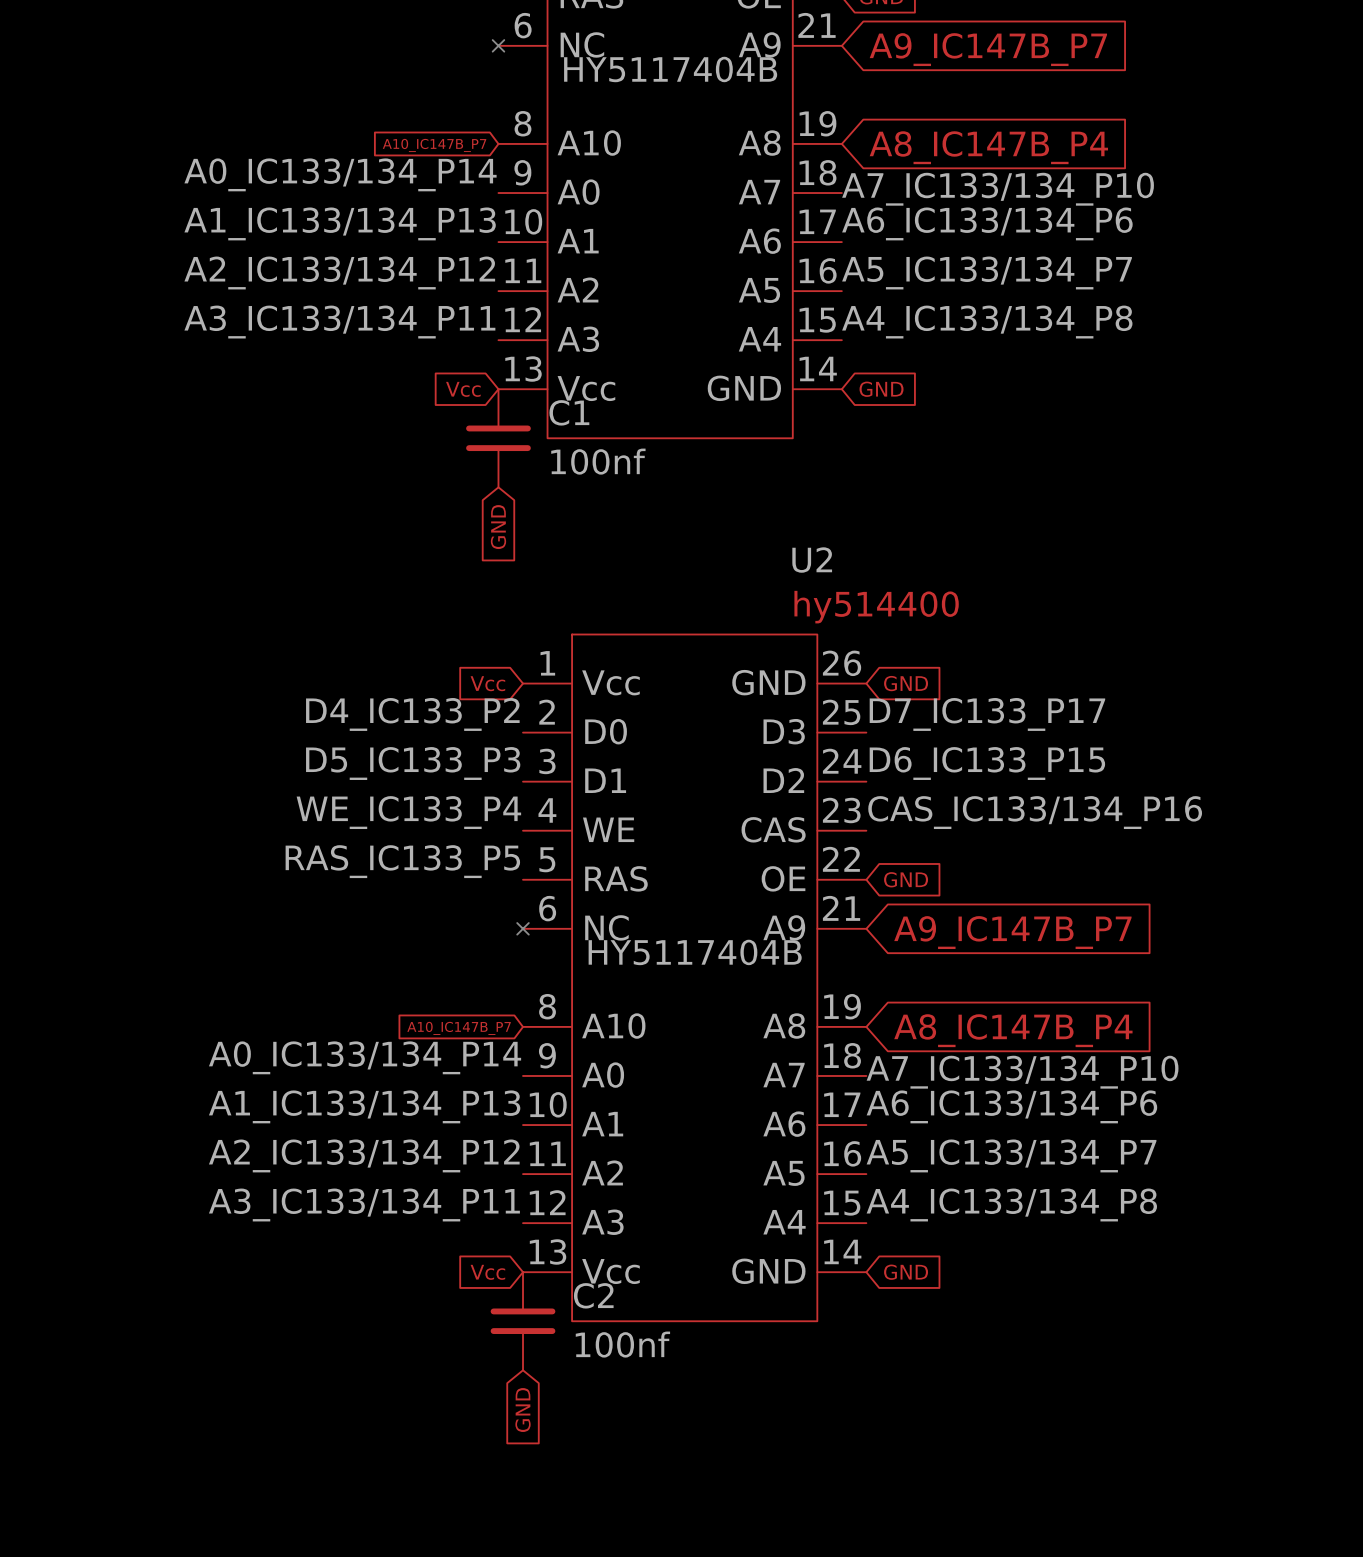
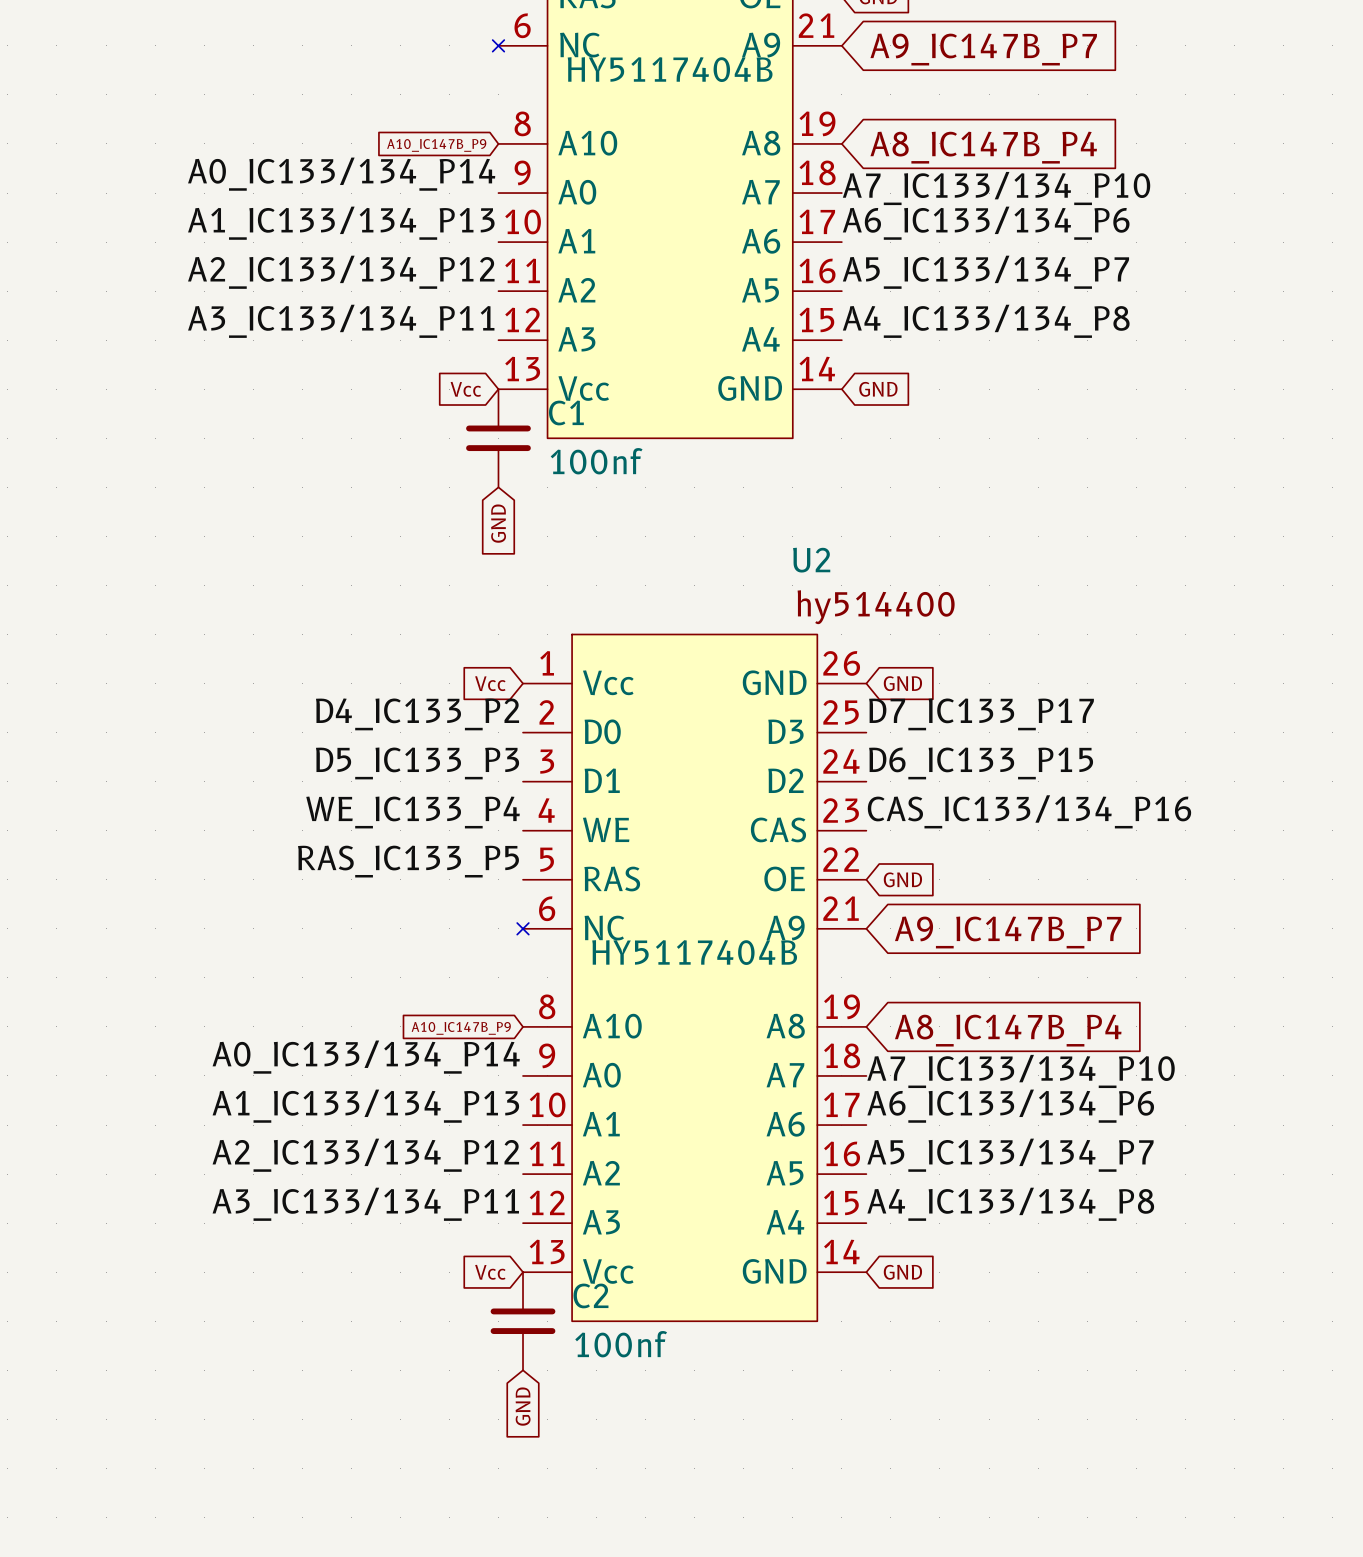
global label: A10_IC147B_P7 (434, 145) -> A10_IC147B_P9 (436, 145)
global label: A10_IC147B_P7 (459, 1028) -> A10_IC147B_P9 (461, 1028)

